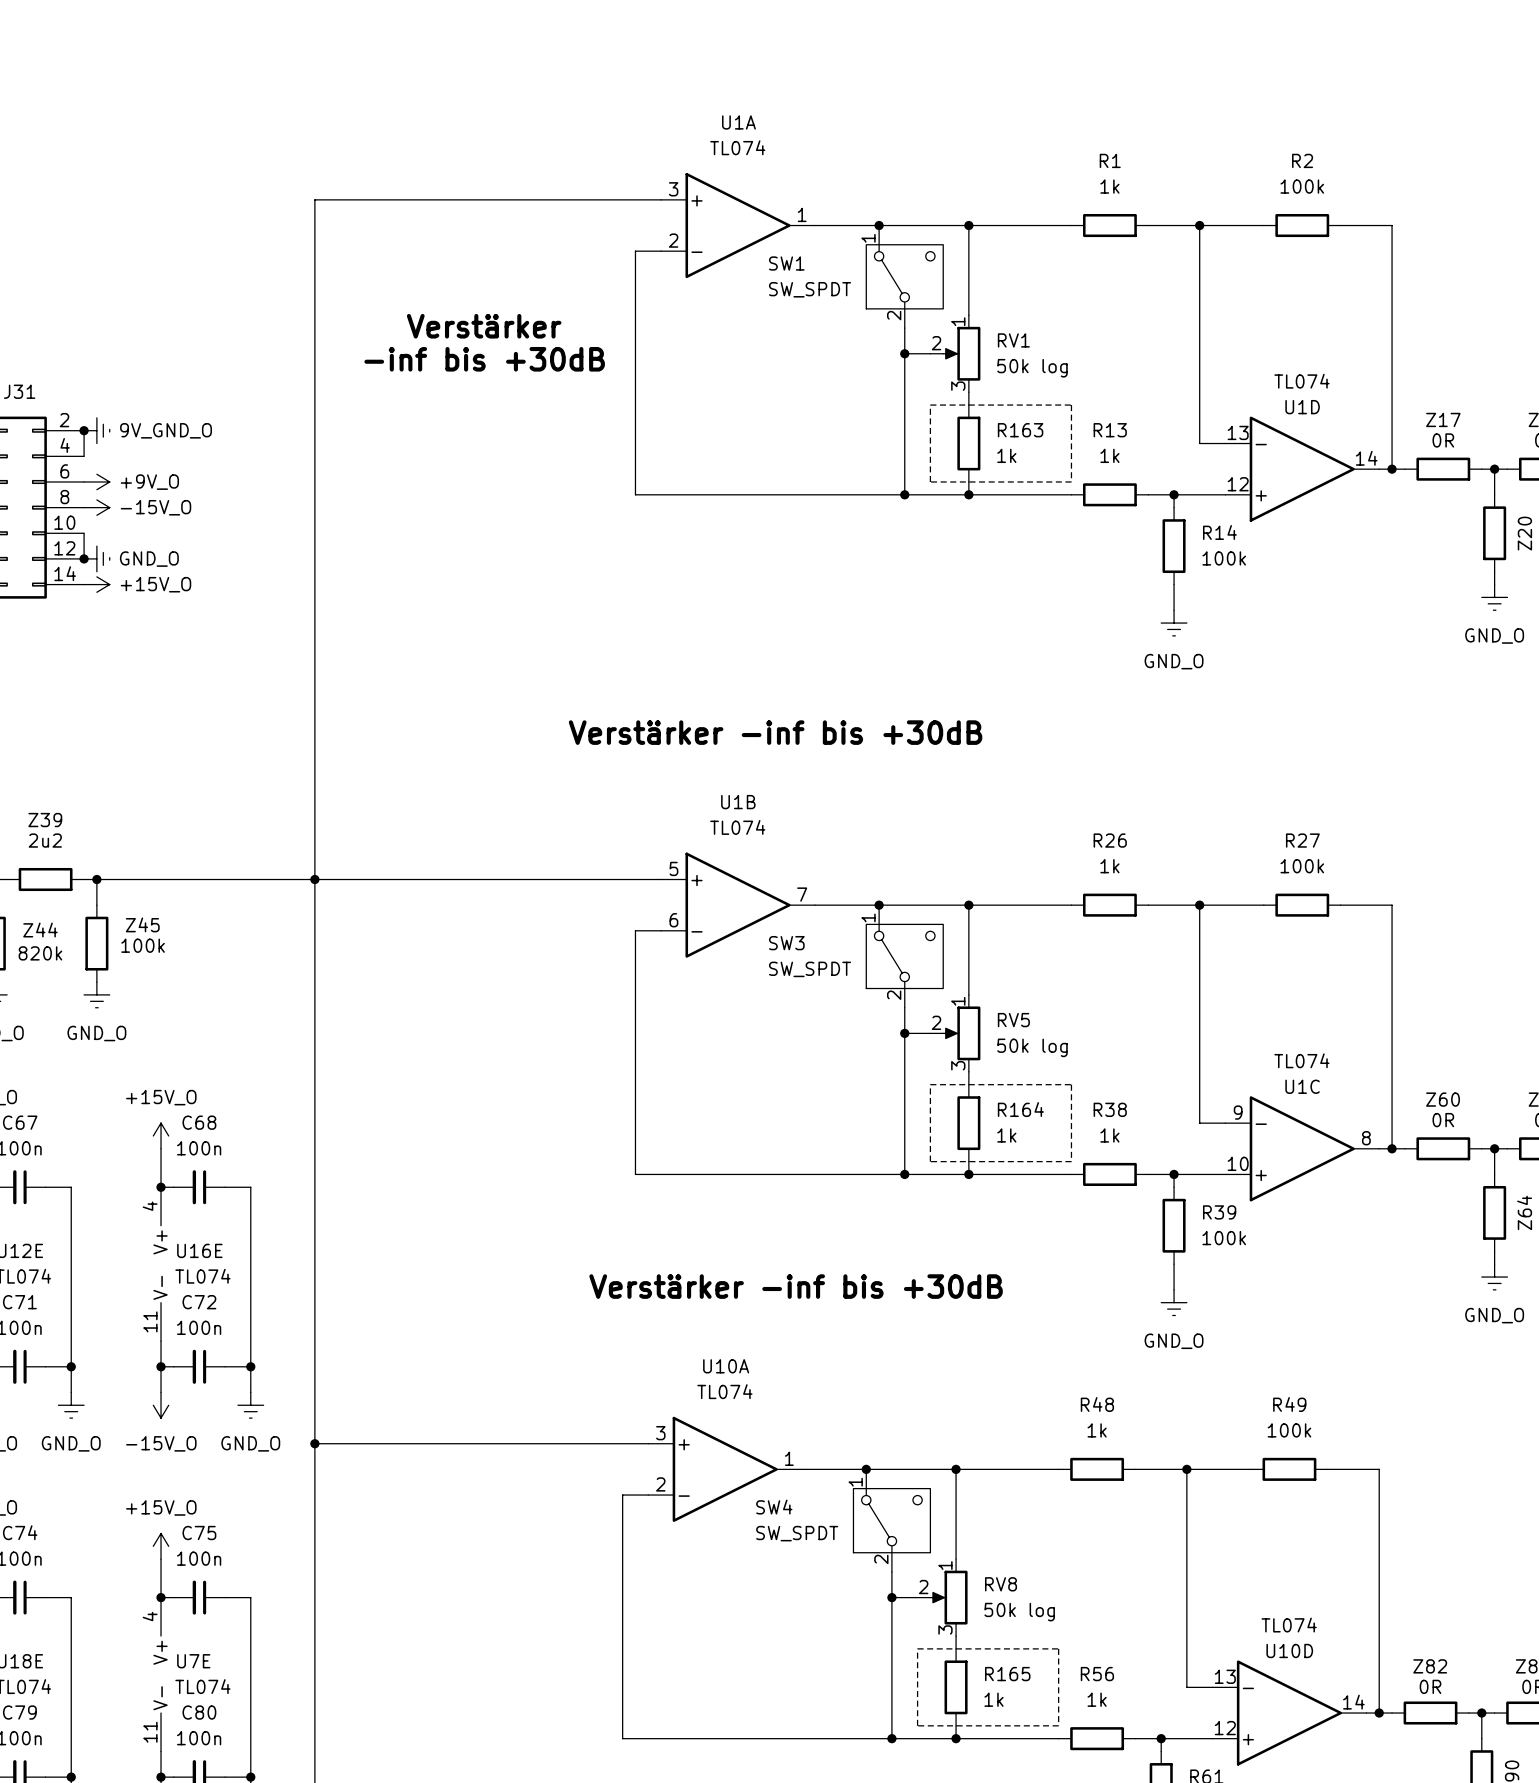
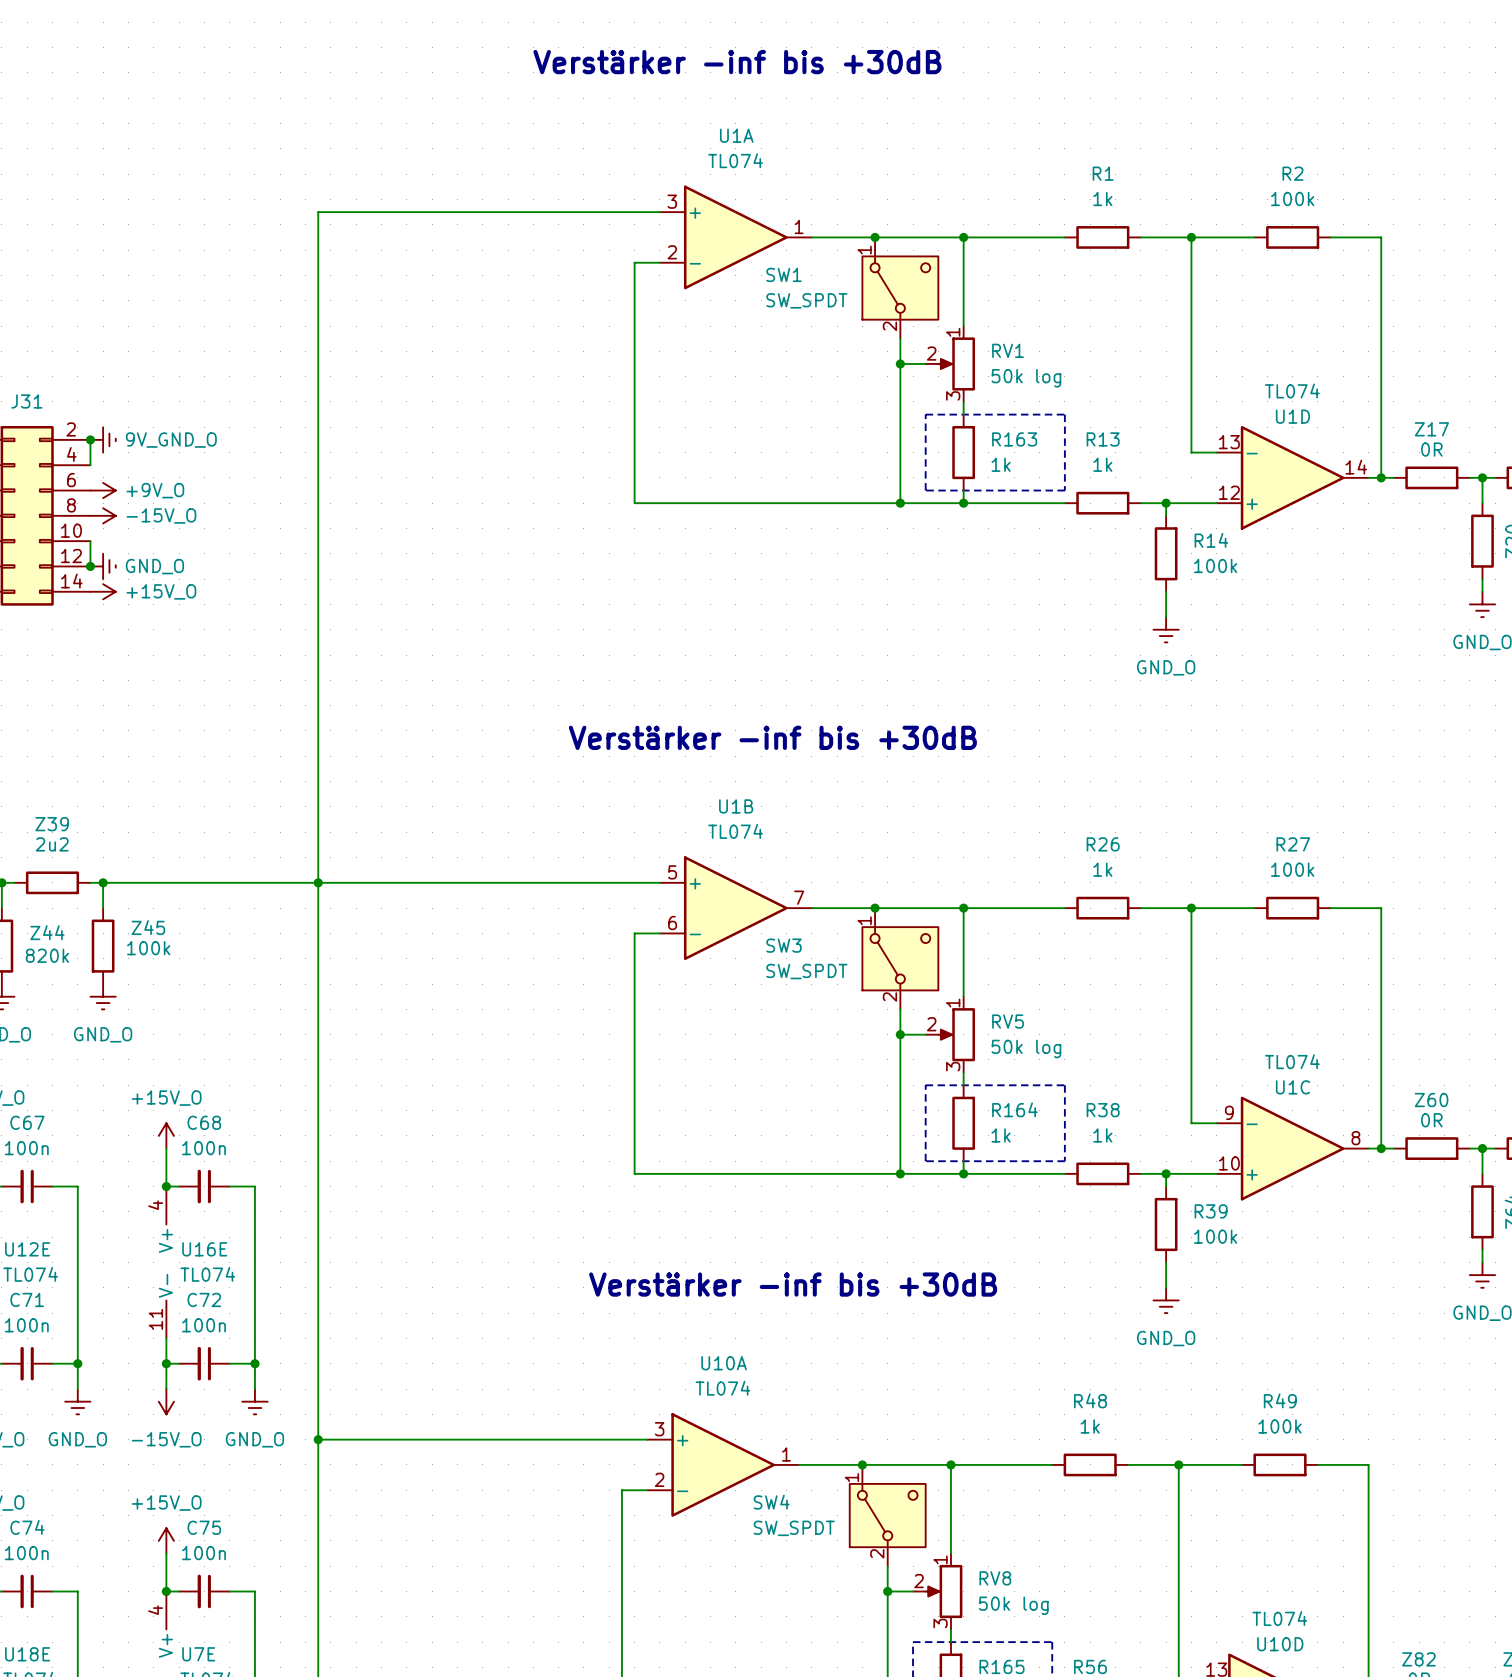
text: none -> Verstärker -inf bis +30dB (737, 62)
text: Verstärker (484, 326) -> none
text: -inf bis +30dB (484, 359) -> none

